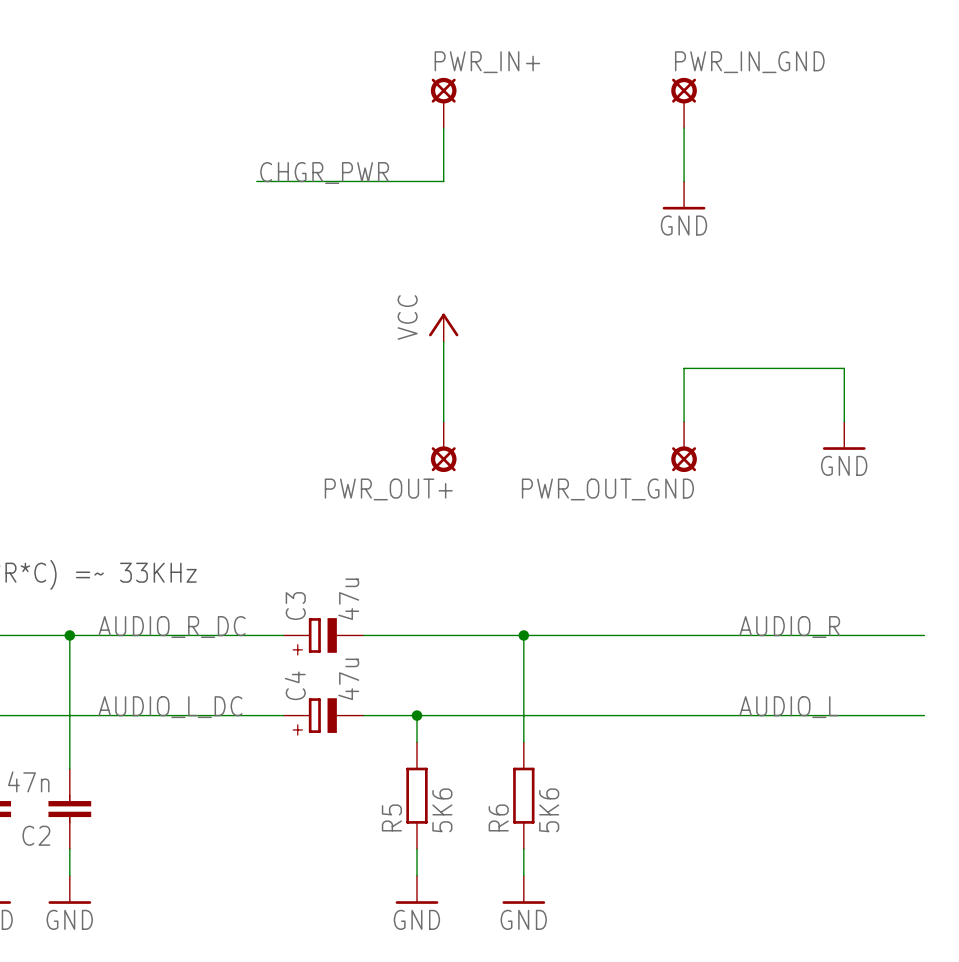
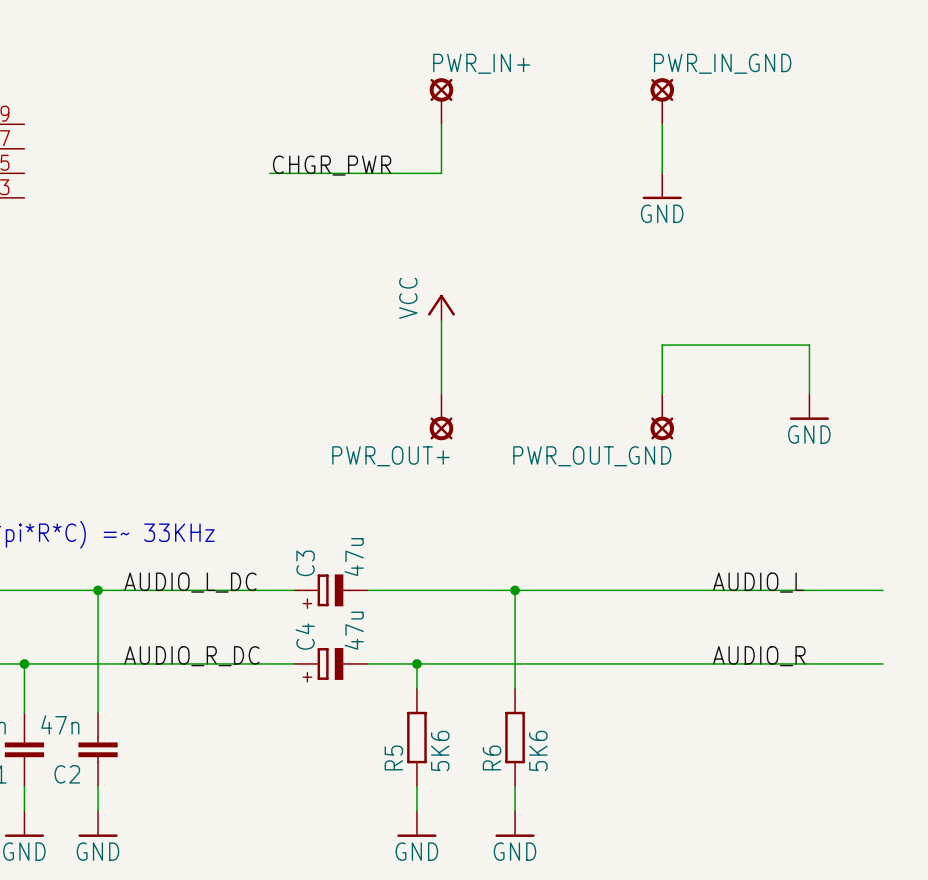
label: AUDIO_R_DC (172, 627) -> AUDIO_L_DC (190, 582)
label: AUDIO_R (789, 627) -> AUDIO_L (758, 582)
label: AUDIO_L_DC (170, 707) -> AUDIO_R_DC (191, 656)
label: AUDIO_L (788, 707) -> AUDIO_R (759, 656)

